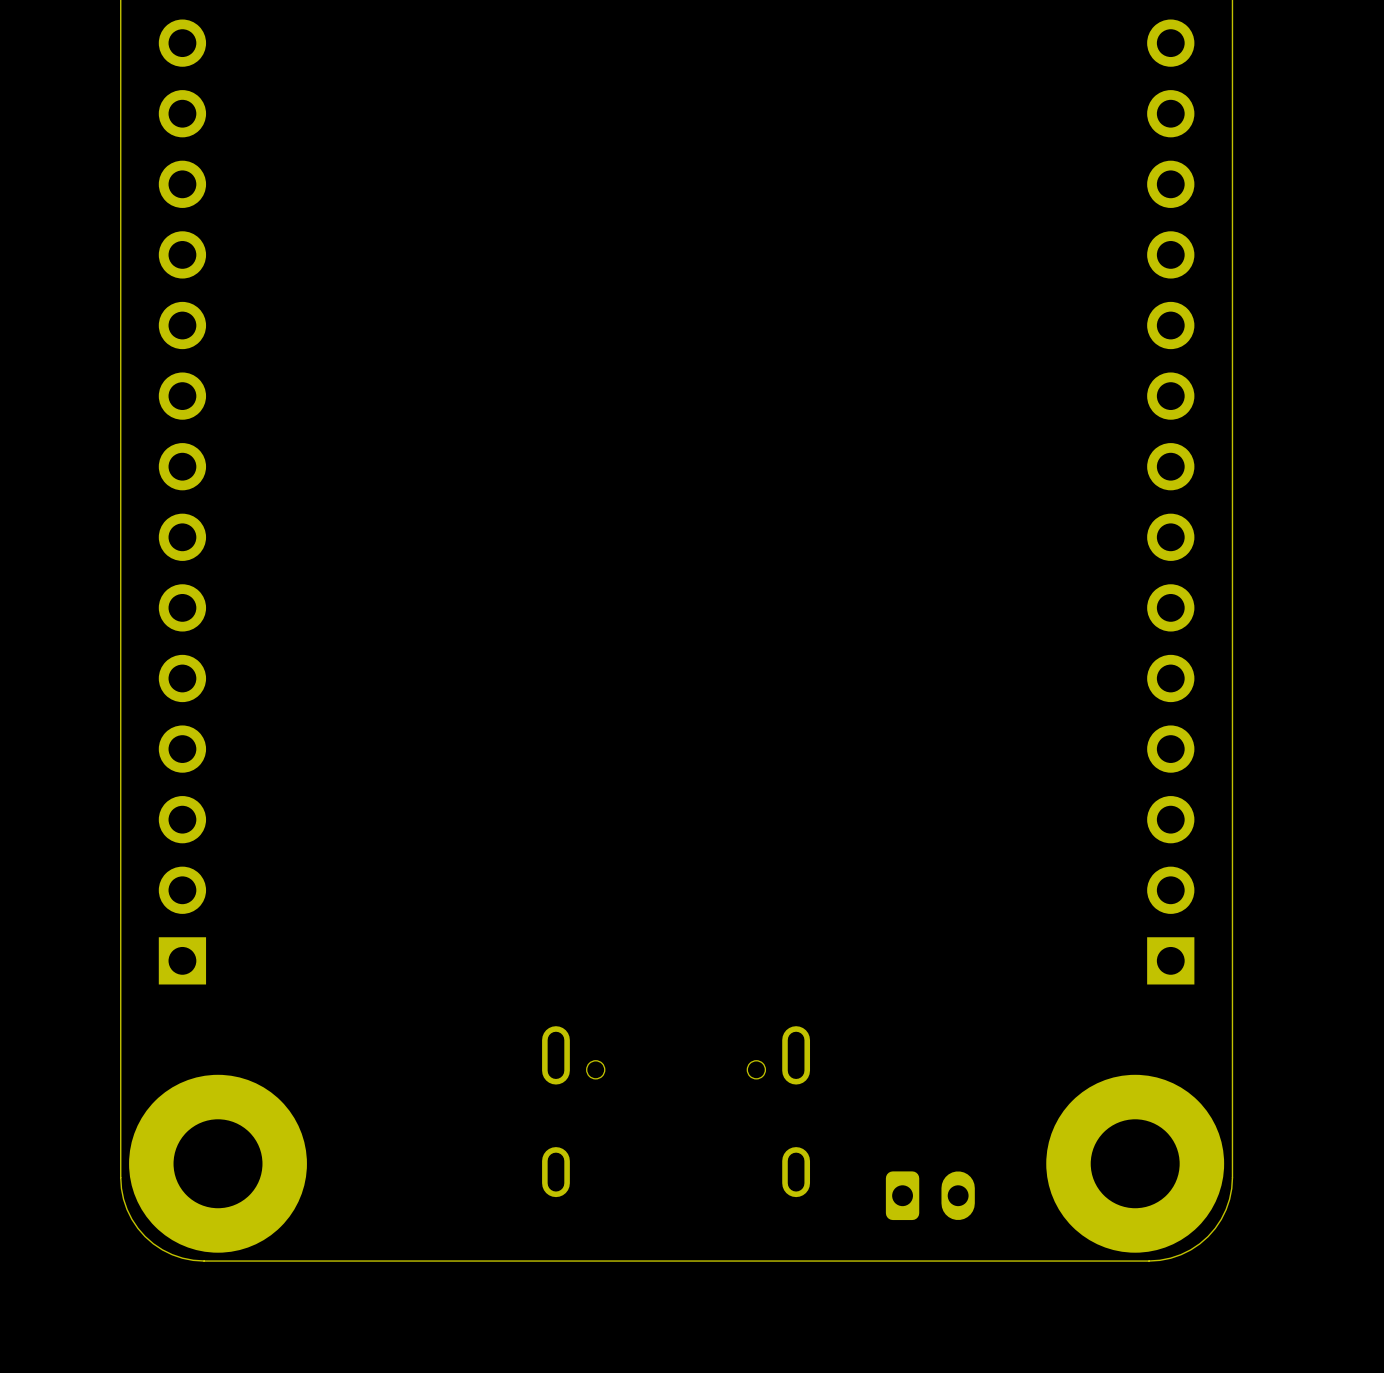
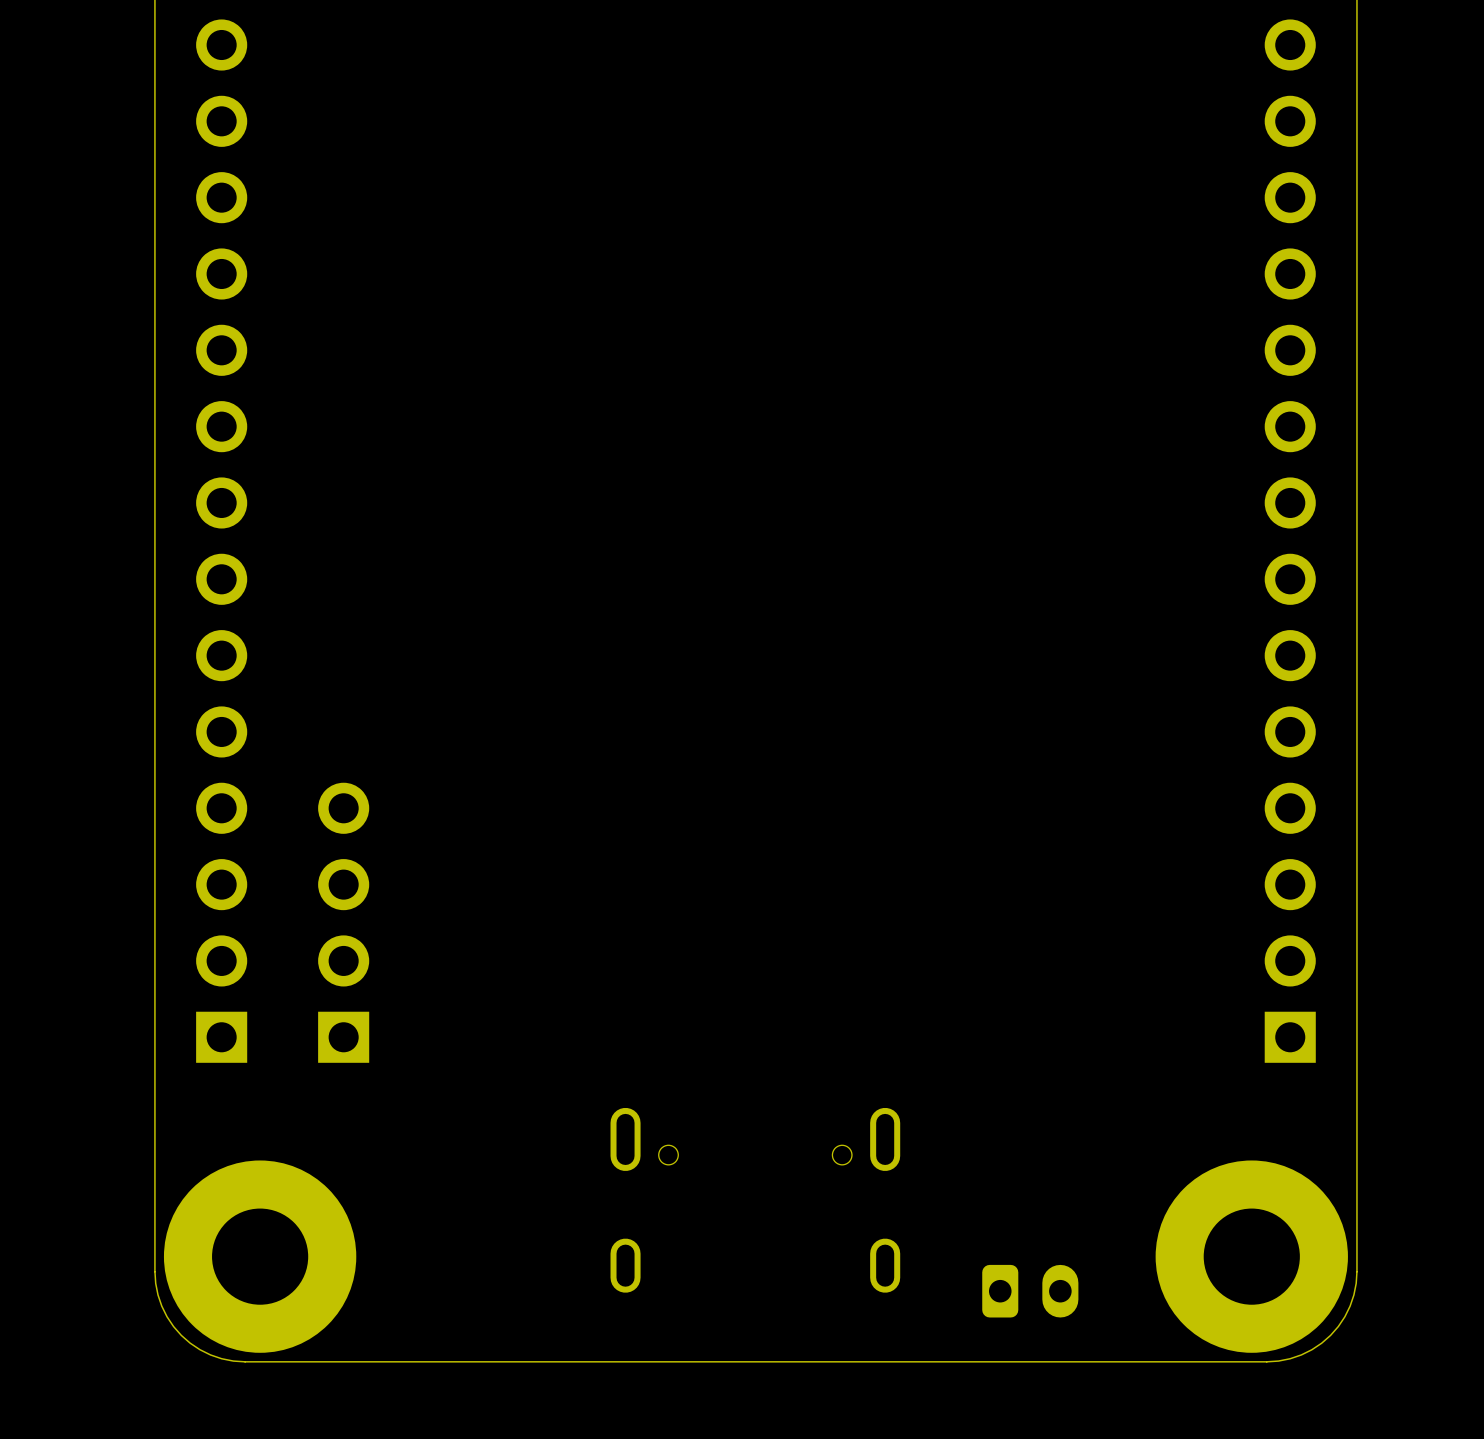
part: none -> (343, 922)

